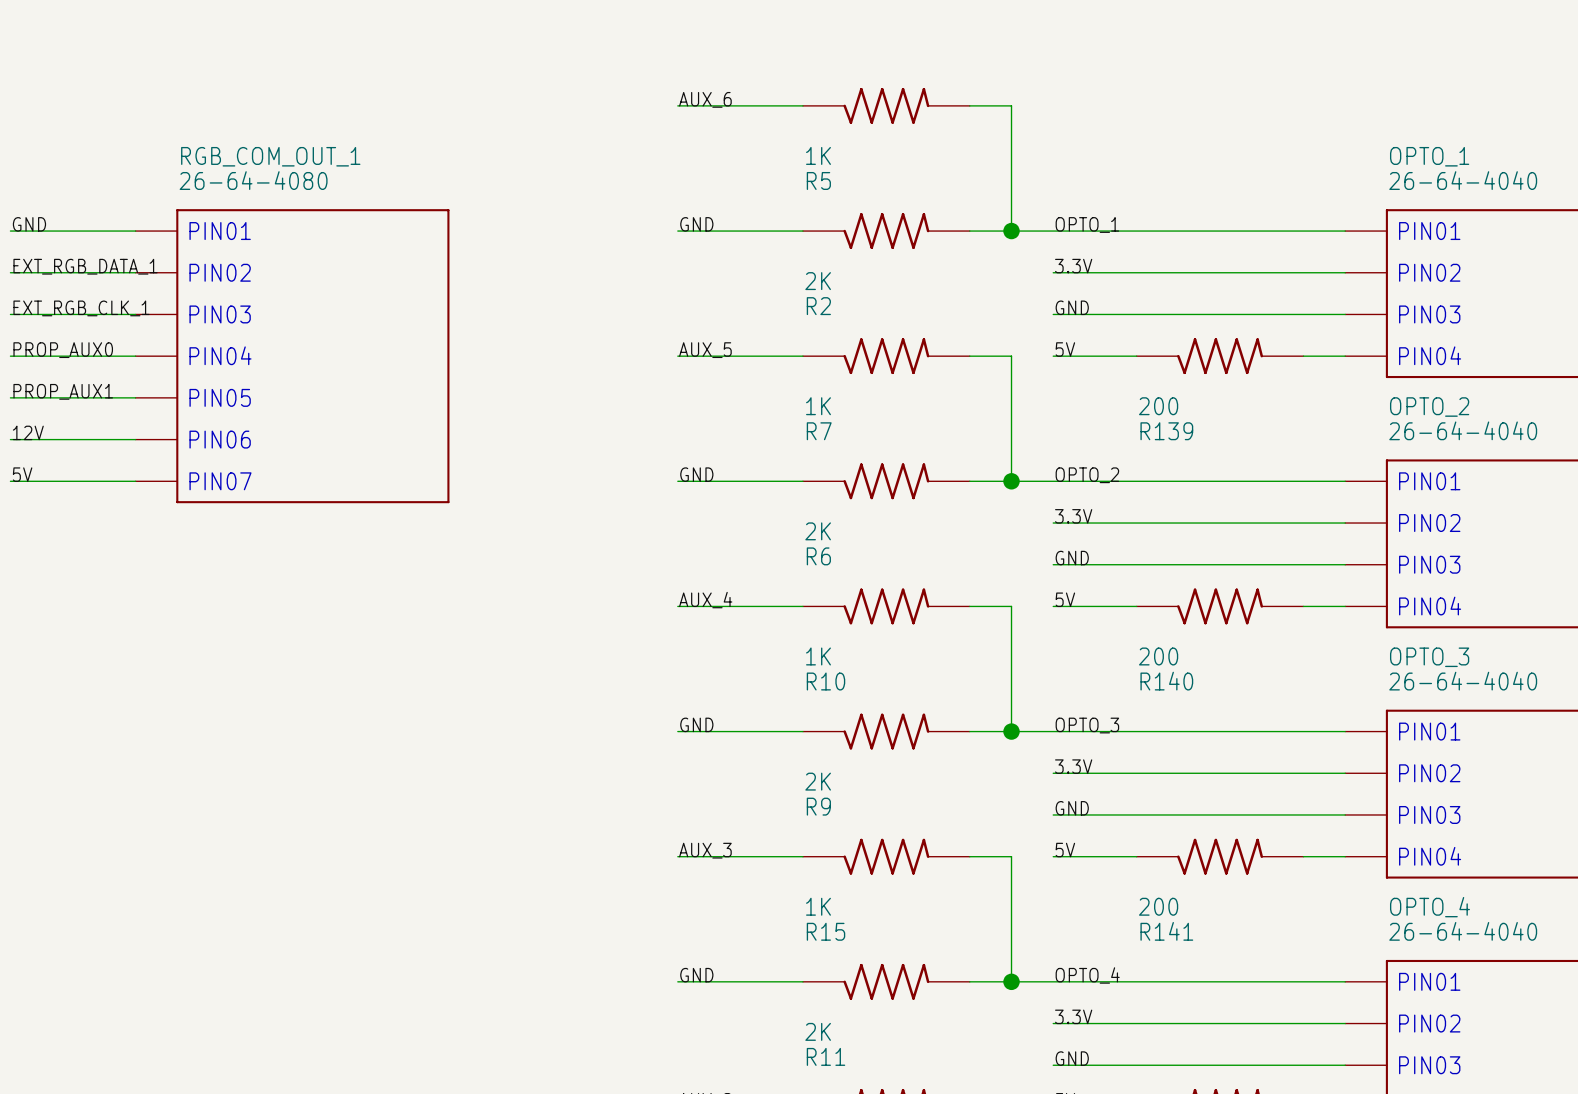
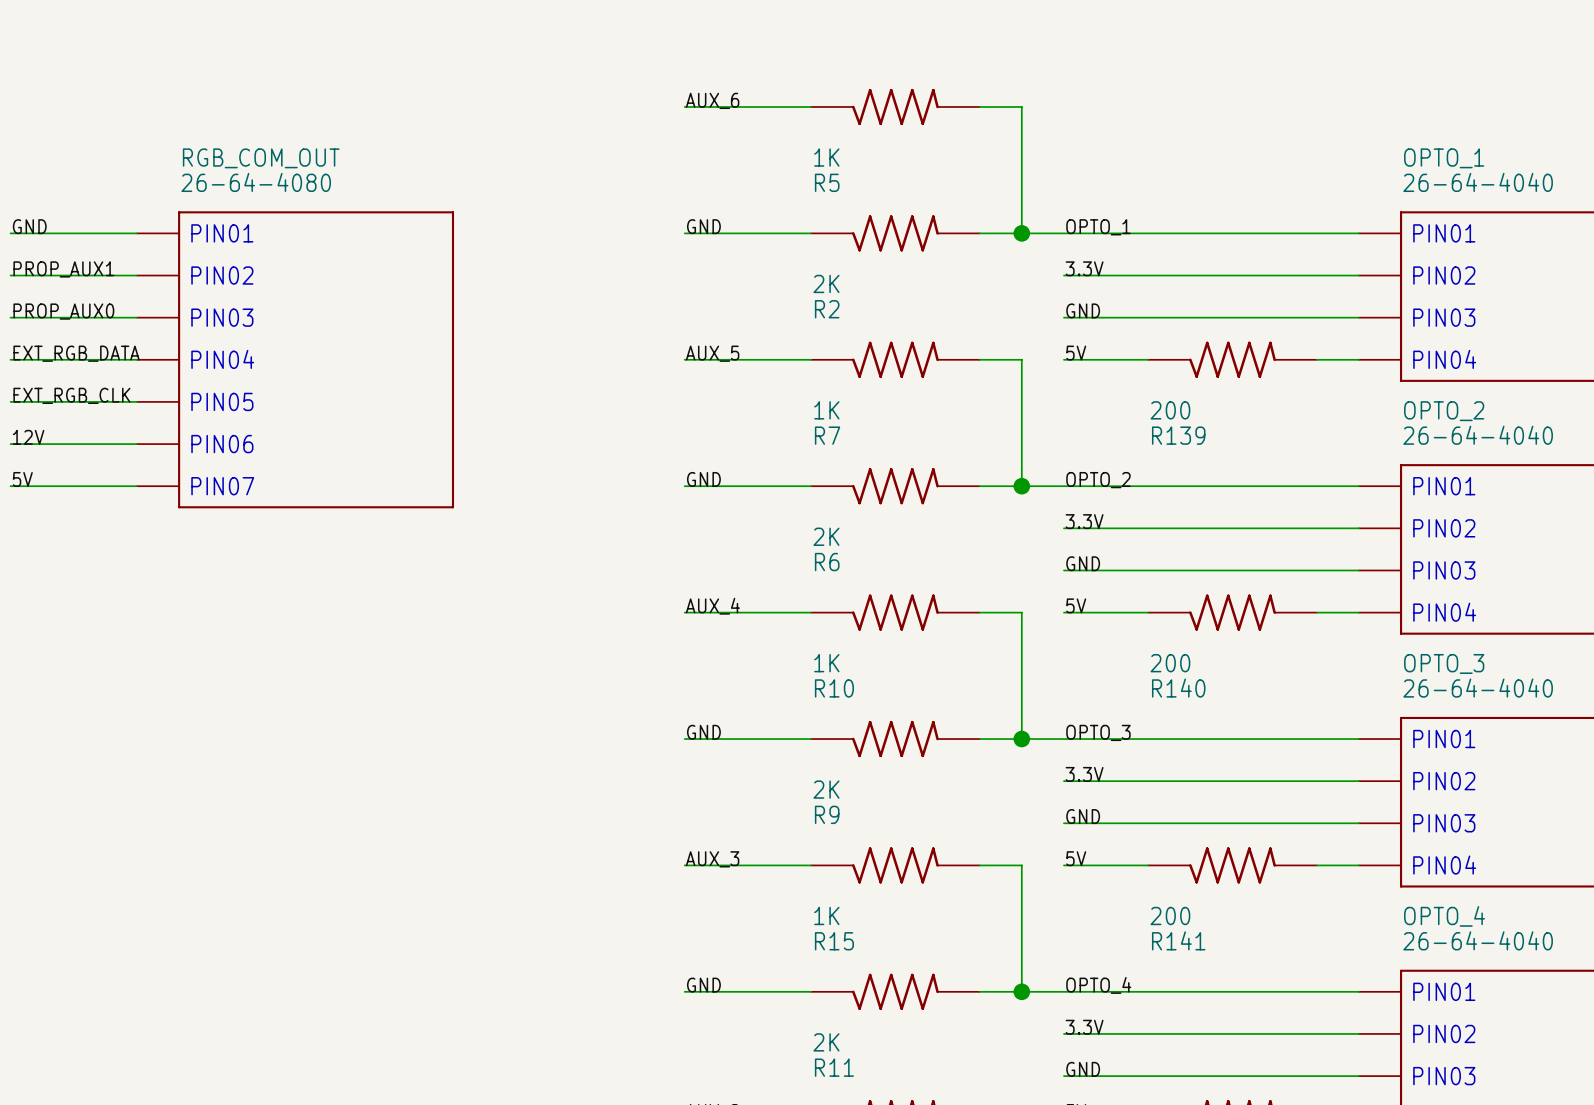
RGB_COM_OUT_1 name: RGB_COM_OUT_1 (270, 156) -> RGB_COM_OUT (261, 158)
label: EXT_RGB_DATA_1 (85, 266) -> PROP_AUX1 (63, 269)
label: EXT_RGB_CLK_1 (81, 308) -> PROP_AUX0 (63, 311)
label: PROP_AUX0 (63, 350) -> EXT_RGB_DATA (76, 353)
label: PROP_AUX1 (63, 391) -> EXT_RGB_CLK (71, 395)

